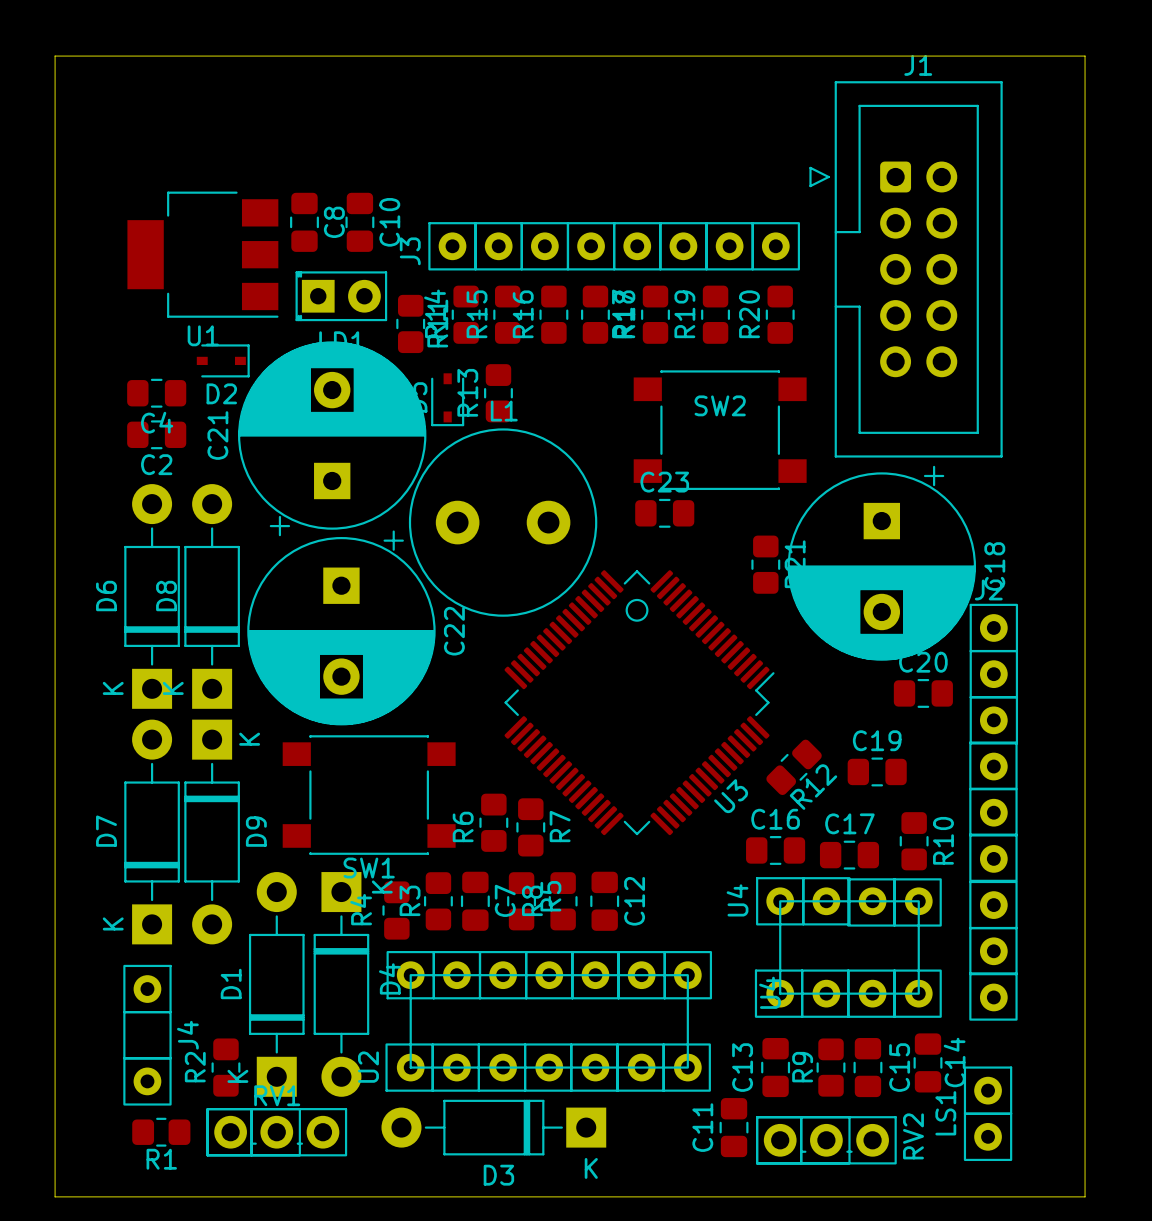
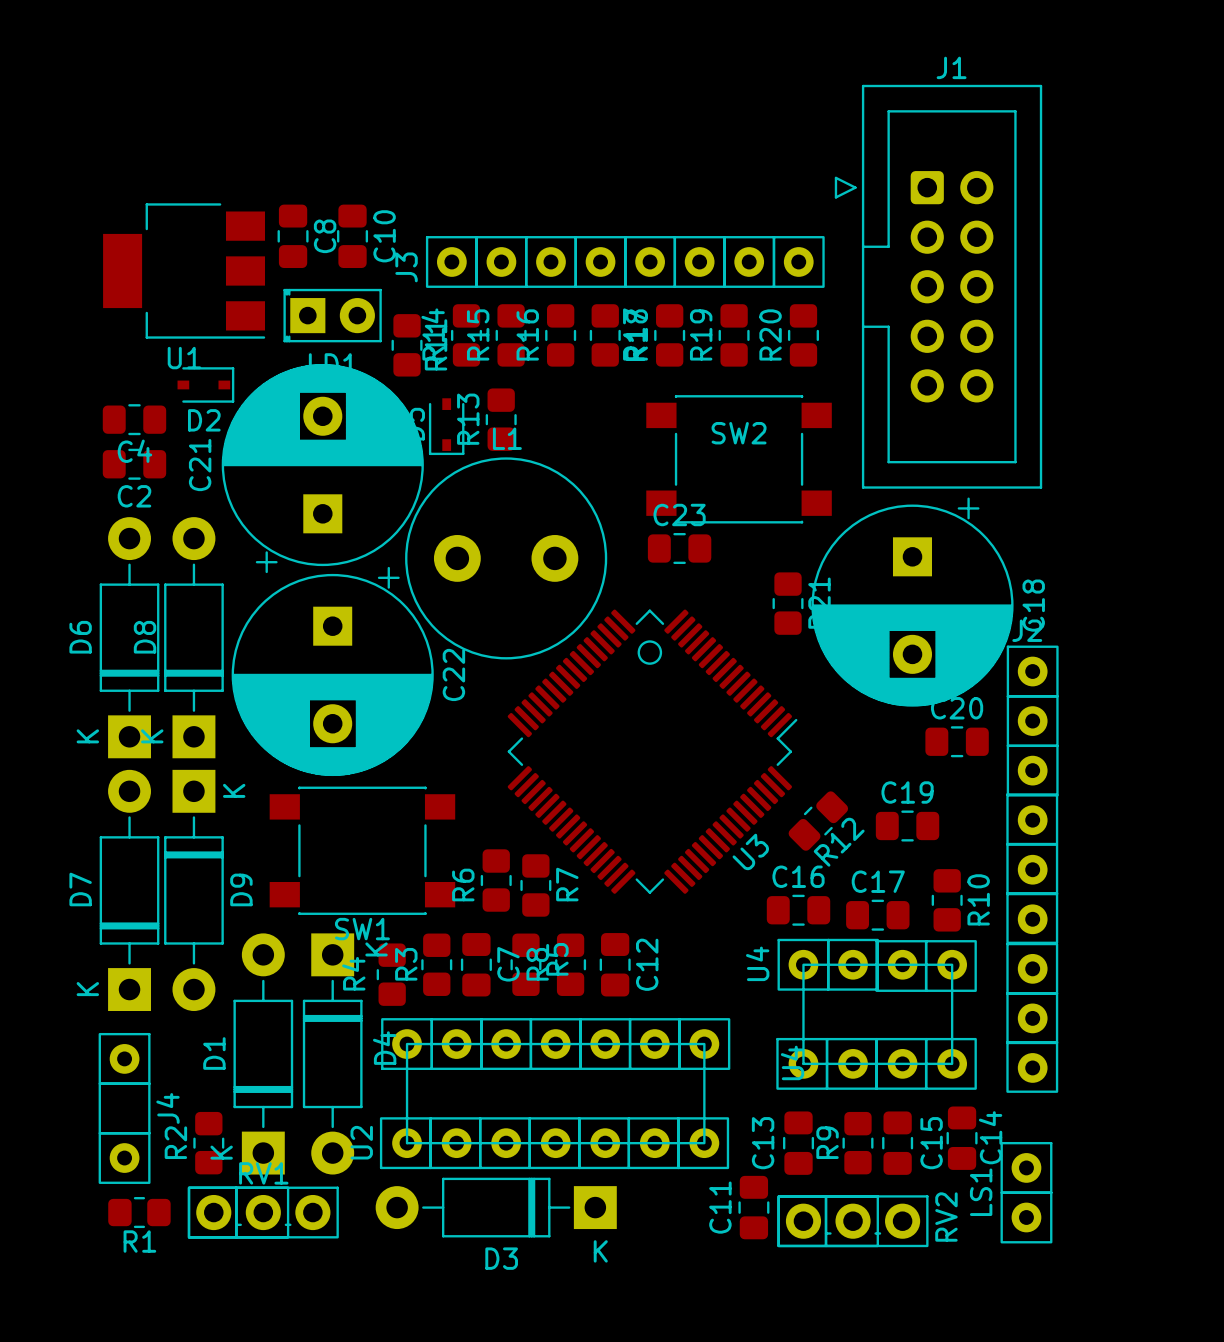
board edge: (55, 56) (1085, 56) (1085, 1196) (55, 1196) (55, 56) -> none

